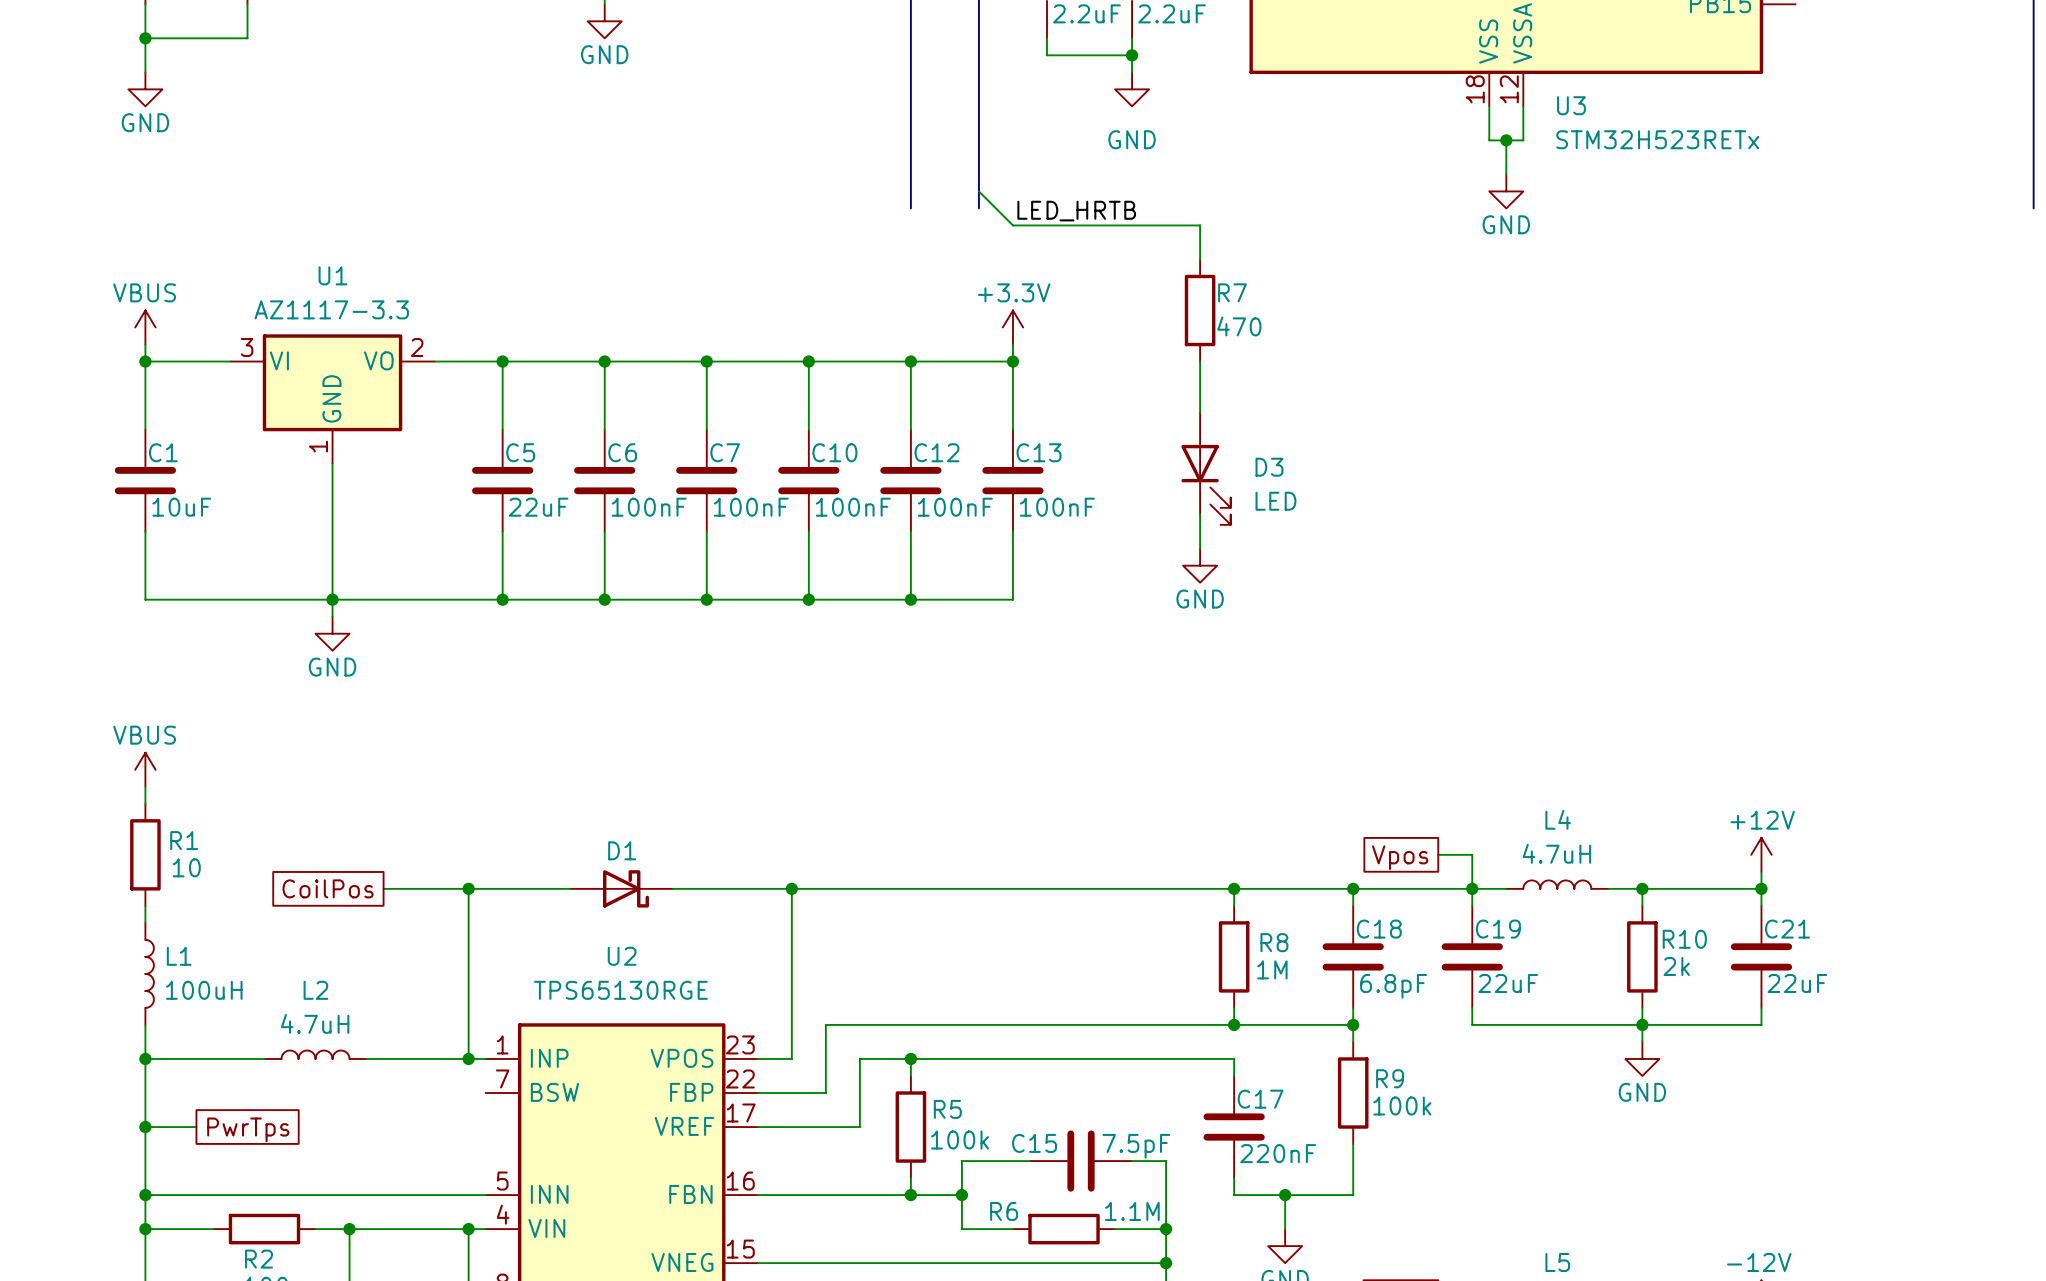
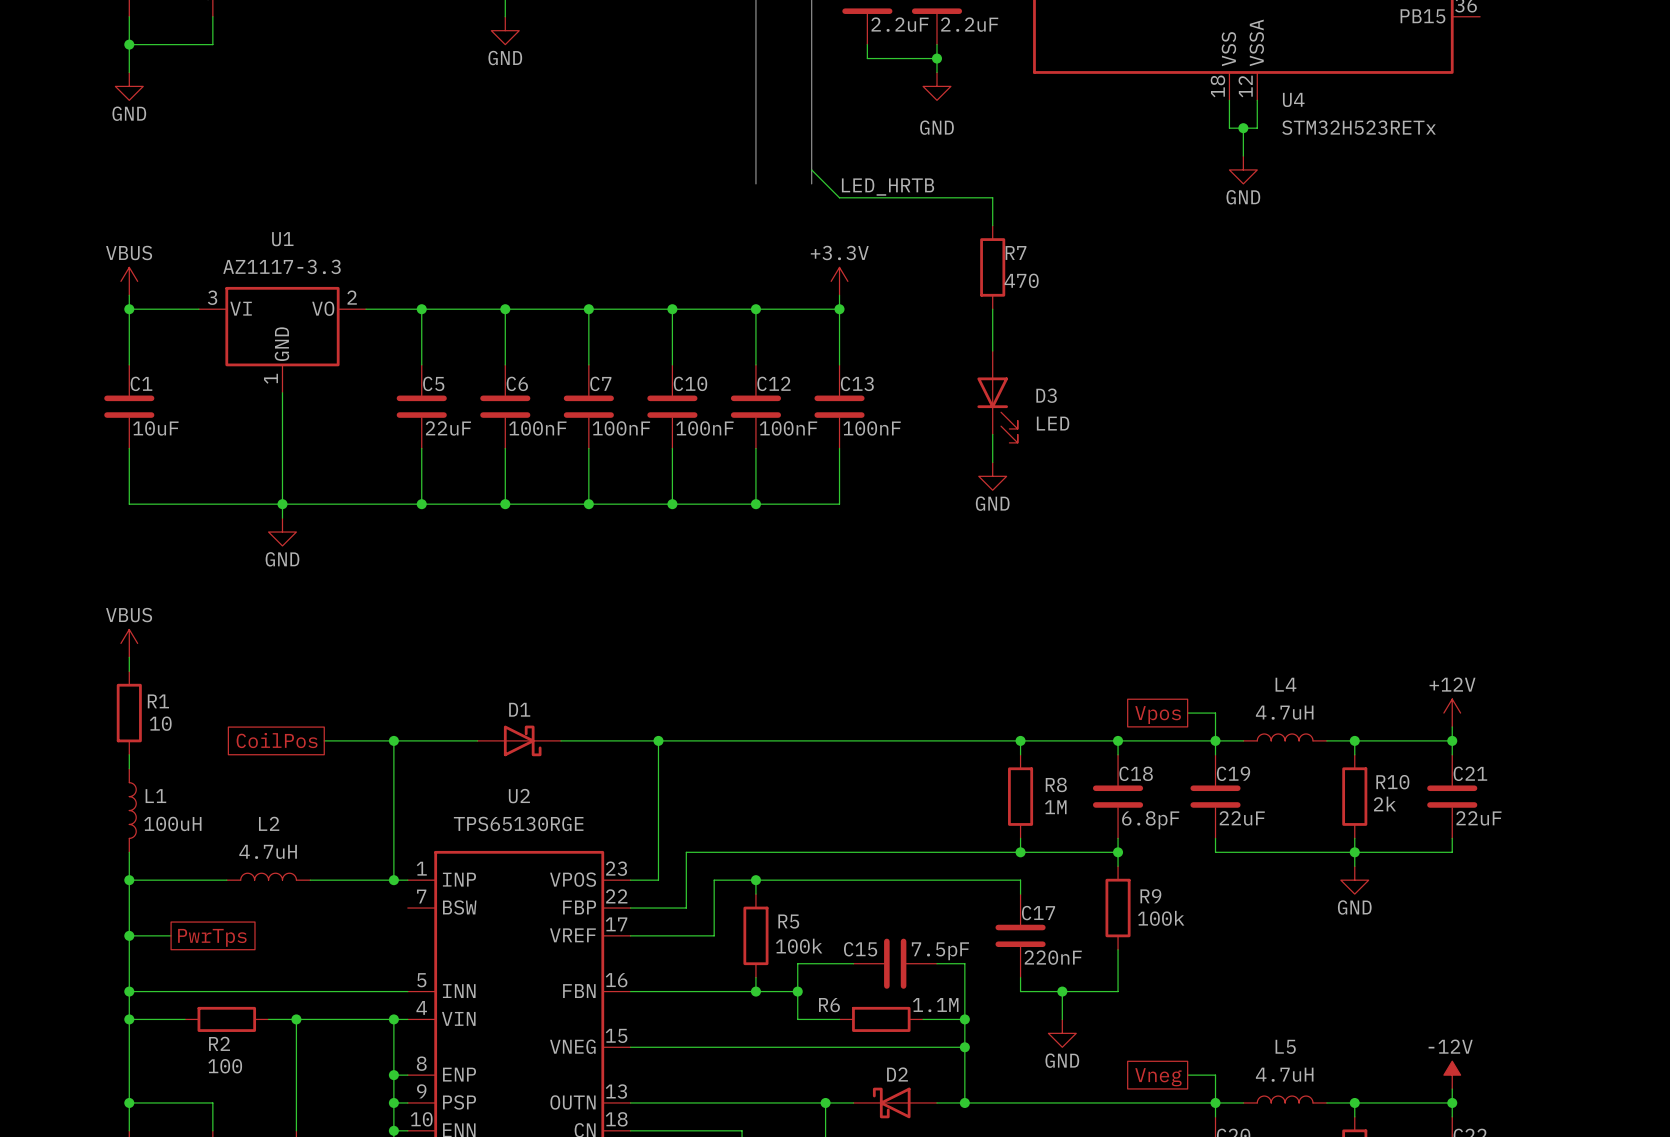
U3 name: U3 (1571, 105) -> U4 (1293, 99)

